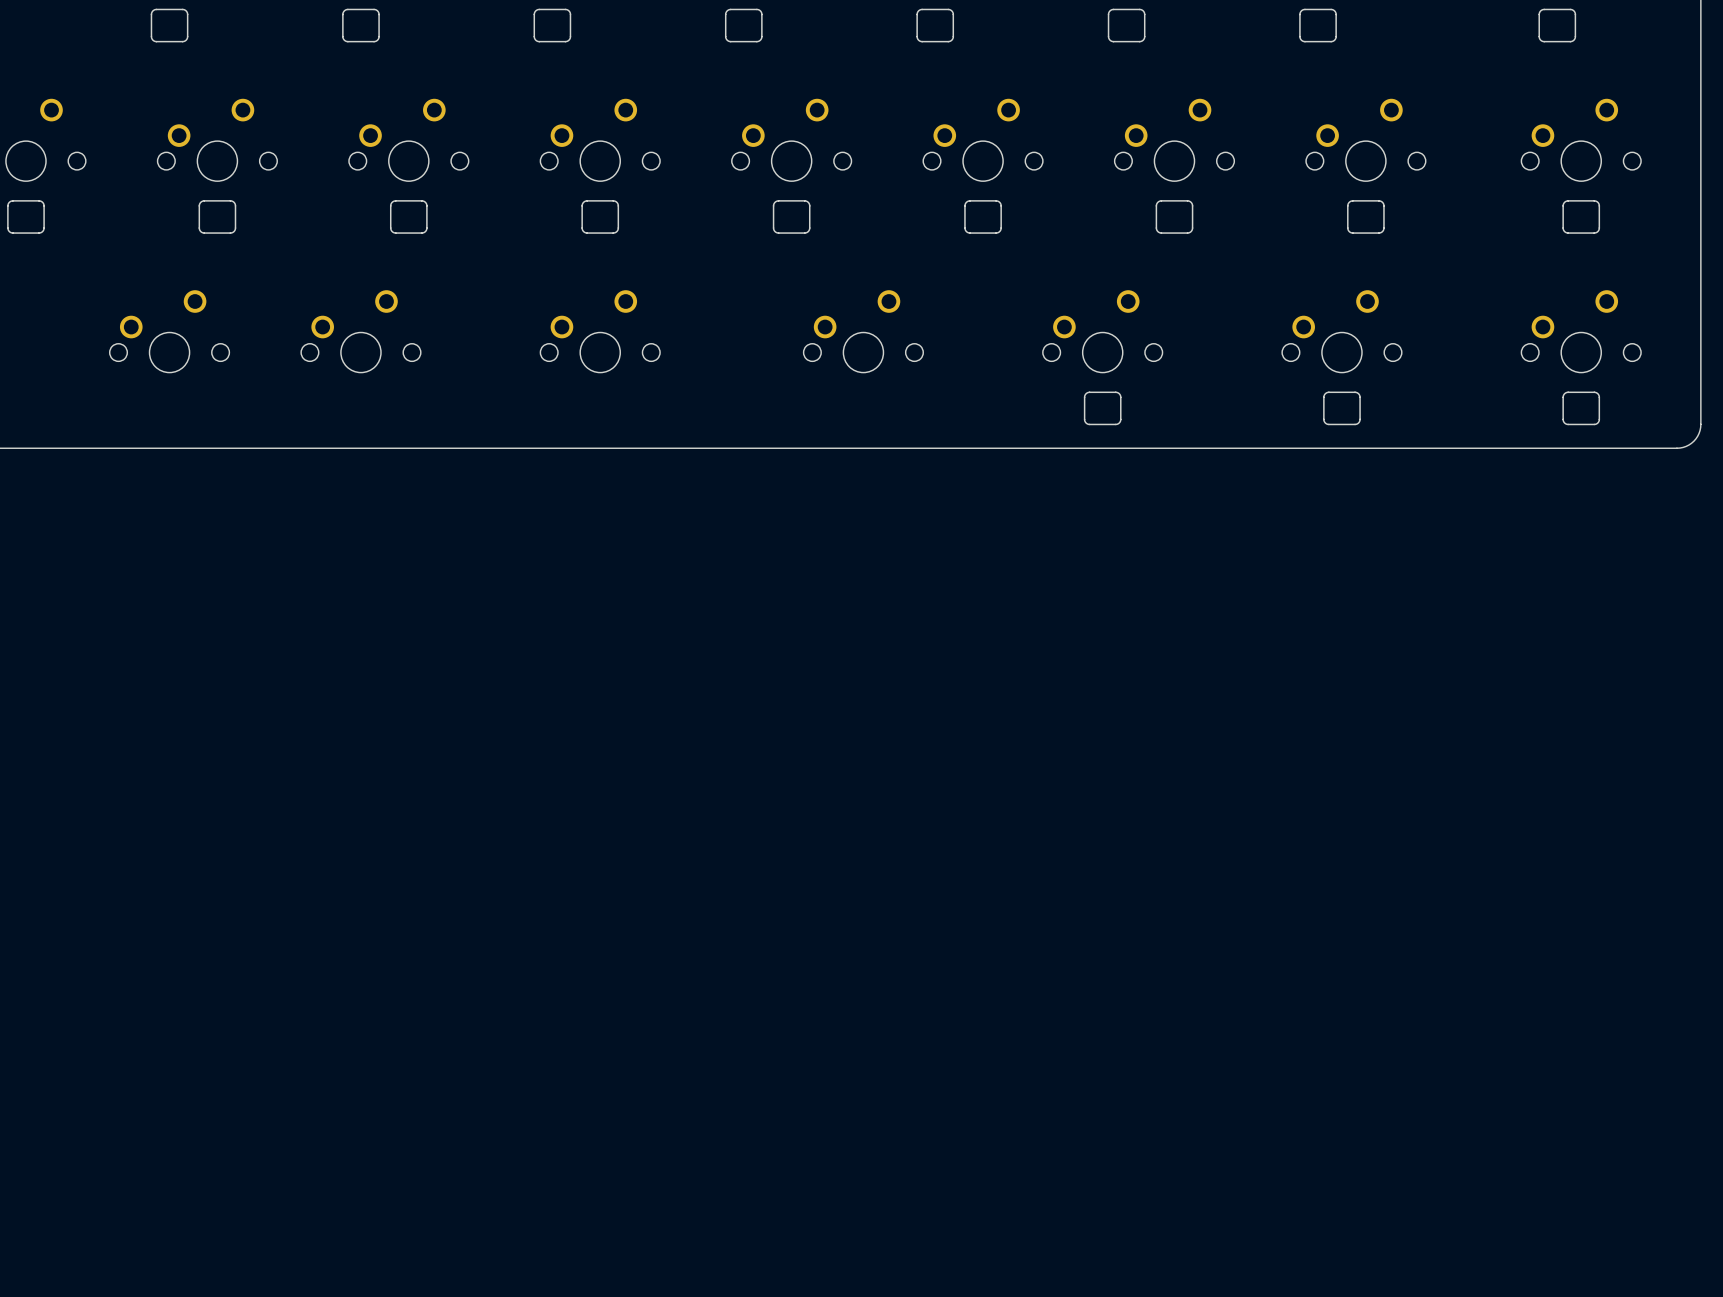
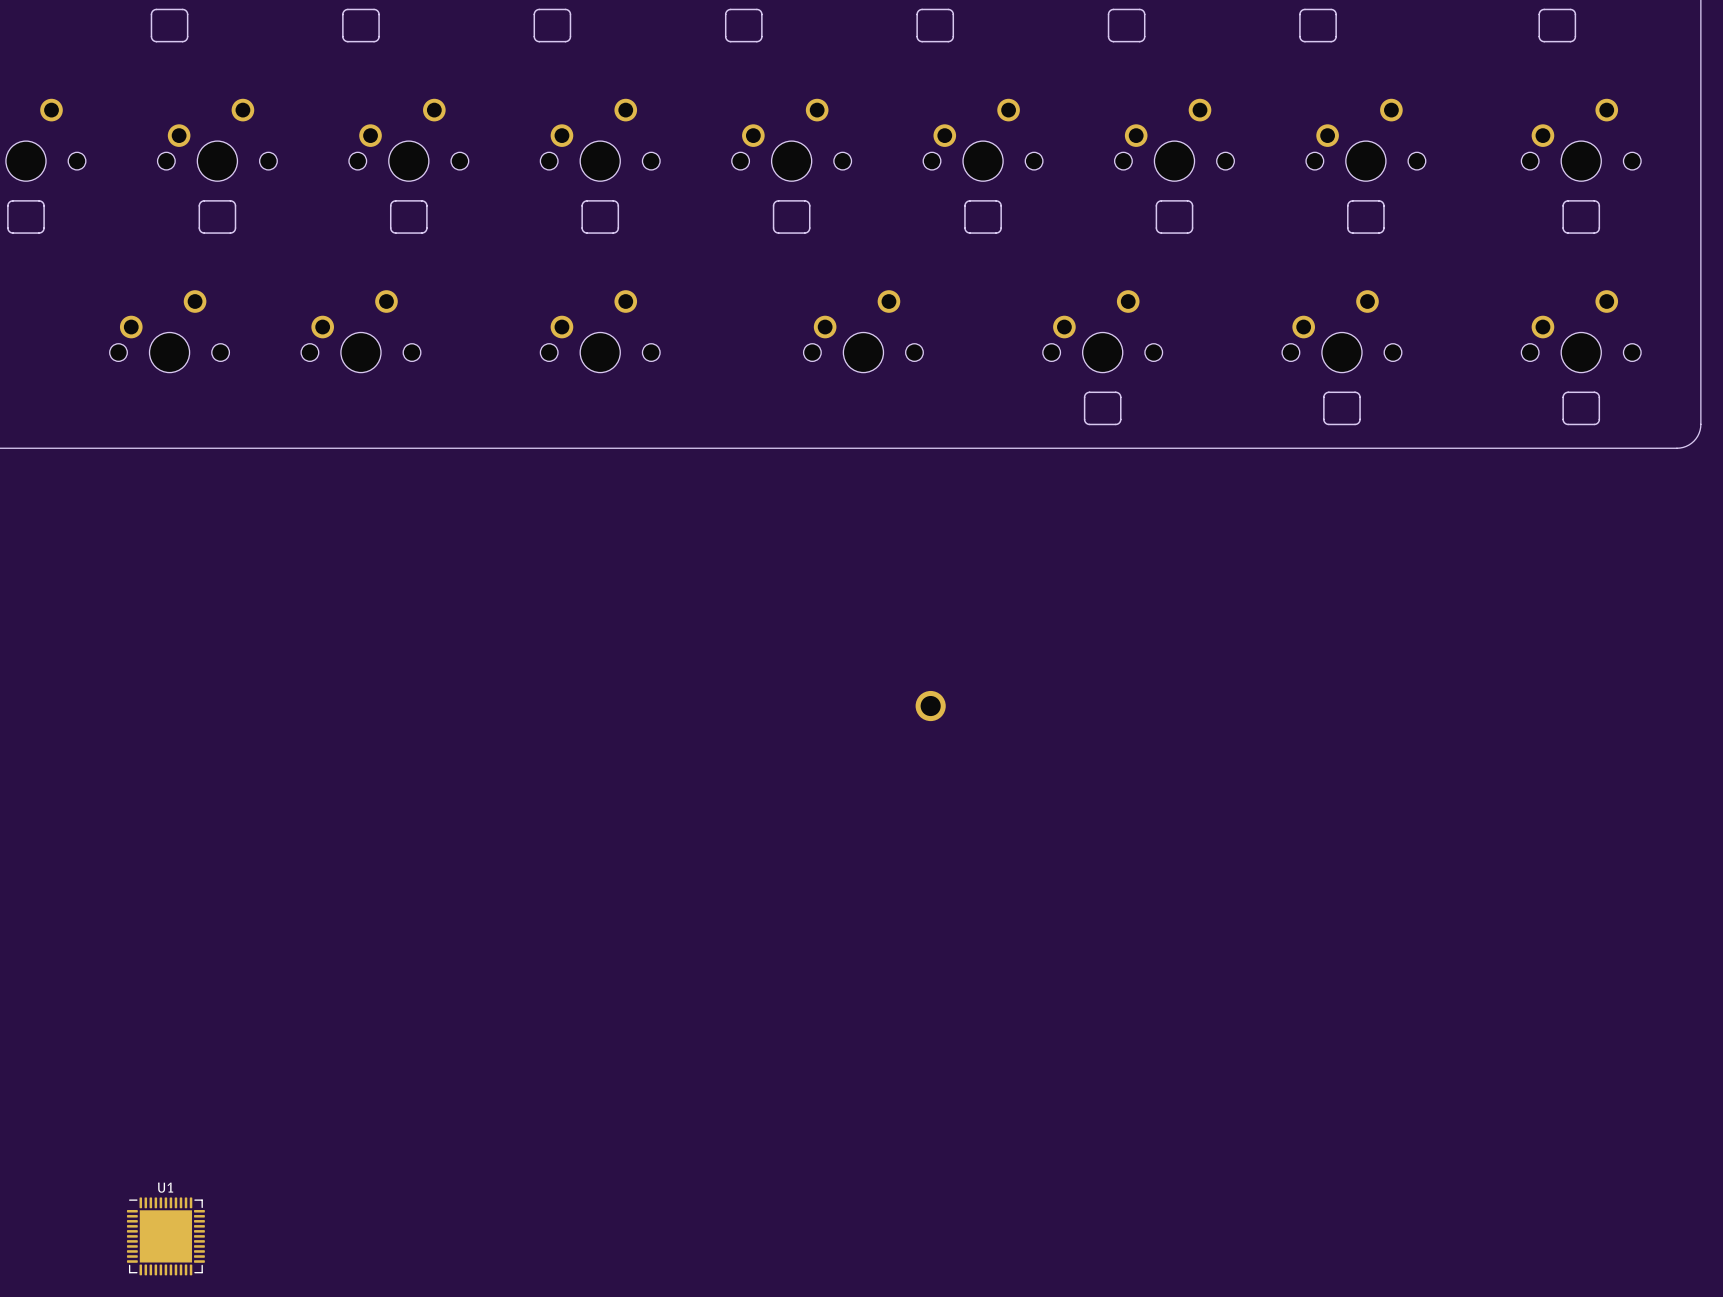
part: none -> (930, 706)
U1: none -> (165, 1236)

